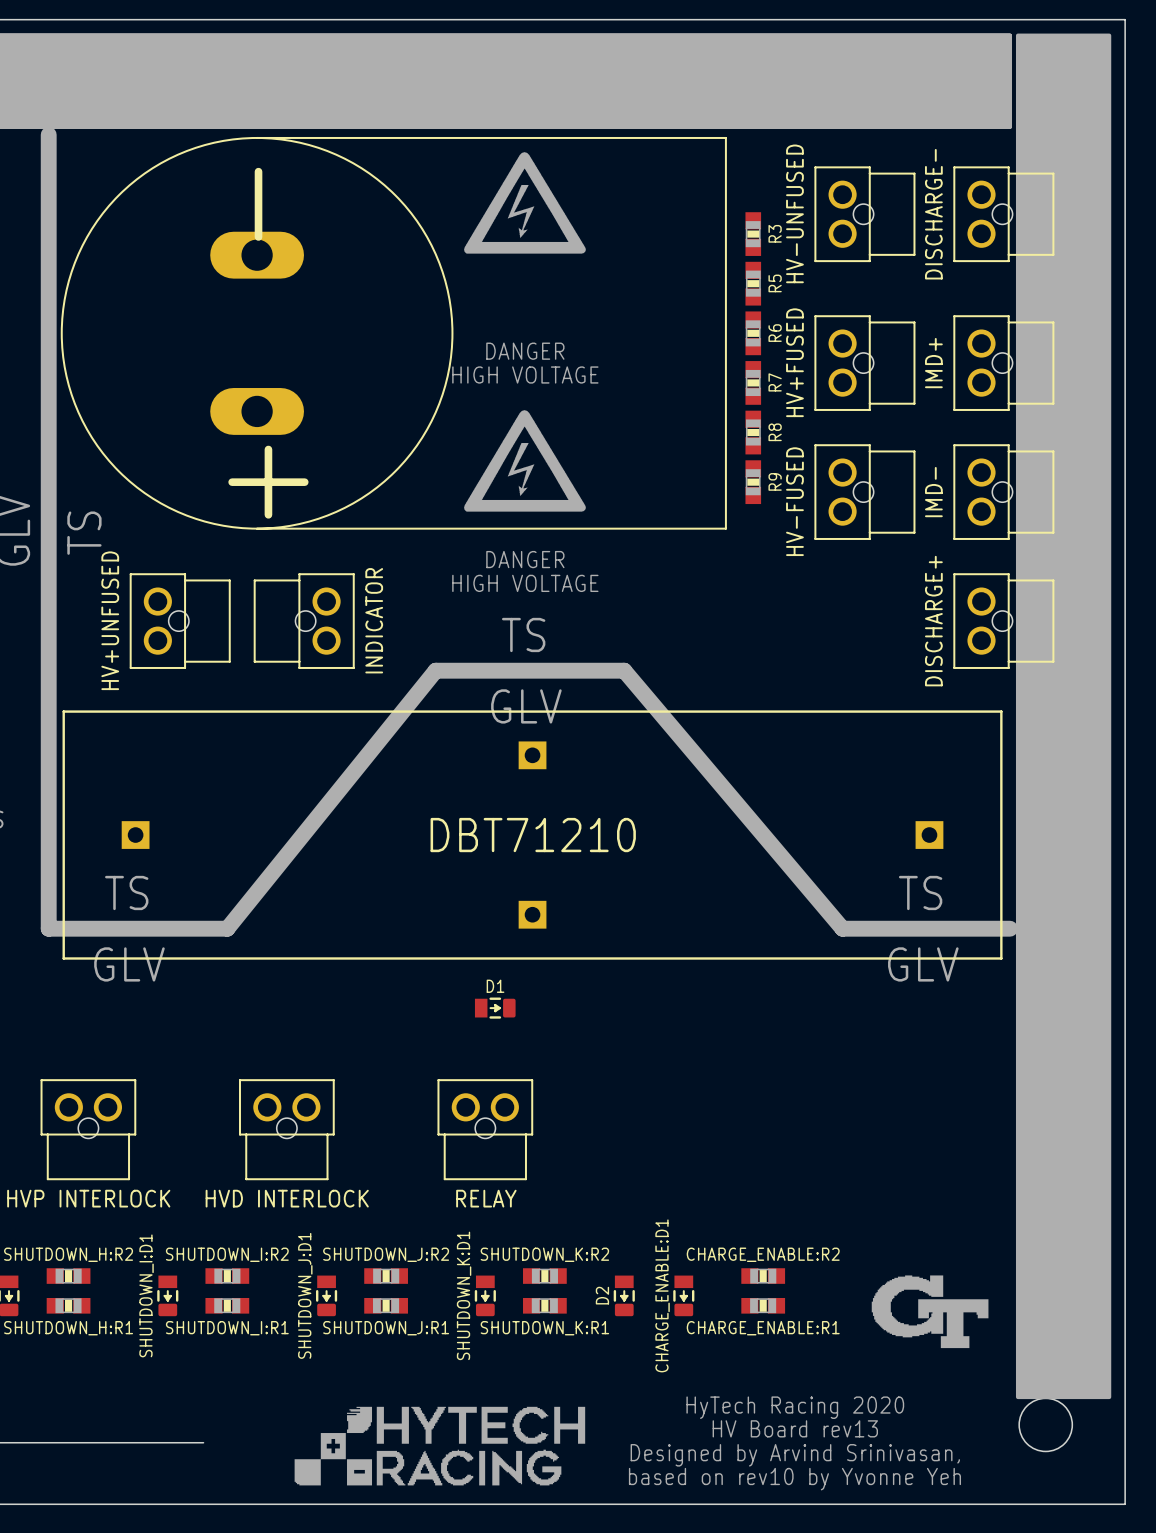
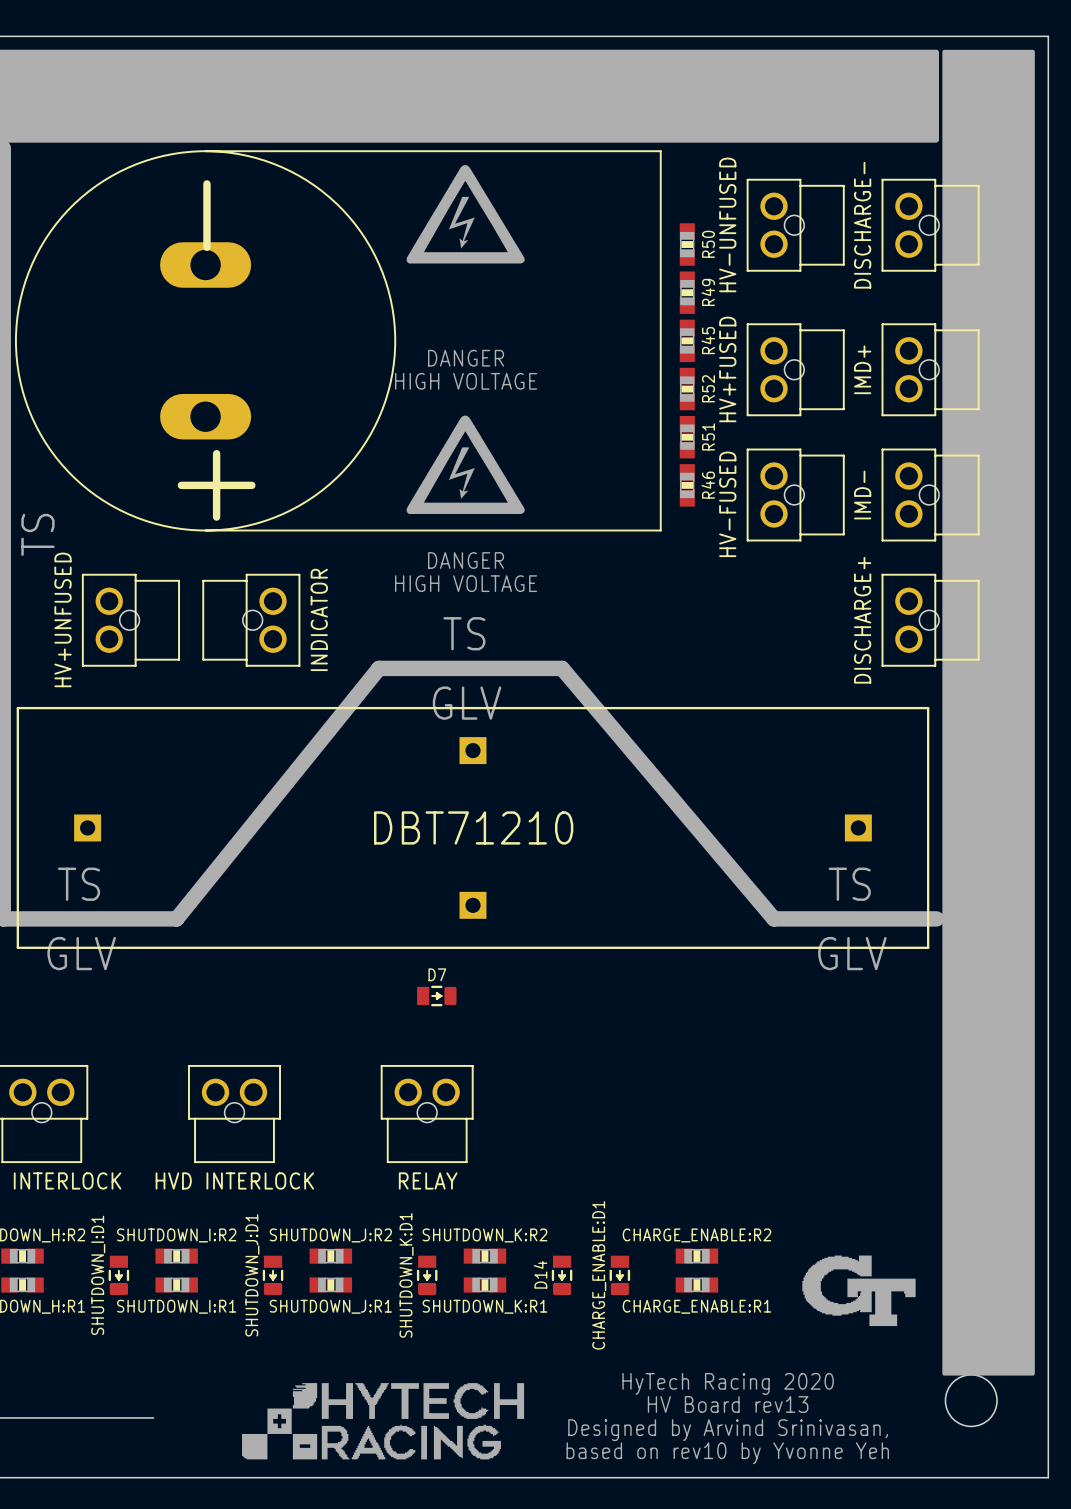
R3 name: R3 (775, 233) -> R50 (708, 244)
R5 name: R5 (775, 283) -> R49 (708, 292)
R6 name: R6 (775, 333) -> R45 (708, 340)
R7 name: R7 (775, 382) -> R52 (708, 388)
R8 name: R8 (775, 432) -> R51 (708, 436)
R9 name: R9 (775, 481) -> R46 (708, 485)
D1 name: D1 (495, 986) -> D7 (437, 974)
D2 name: D2 (602, 1295) -> D14 (540, 1274)

